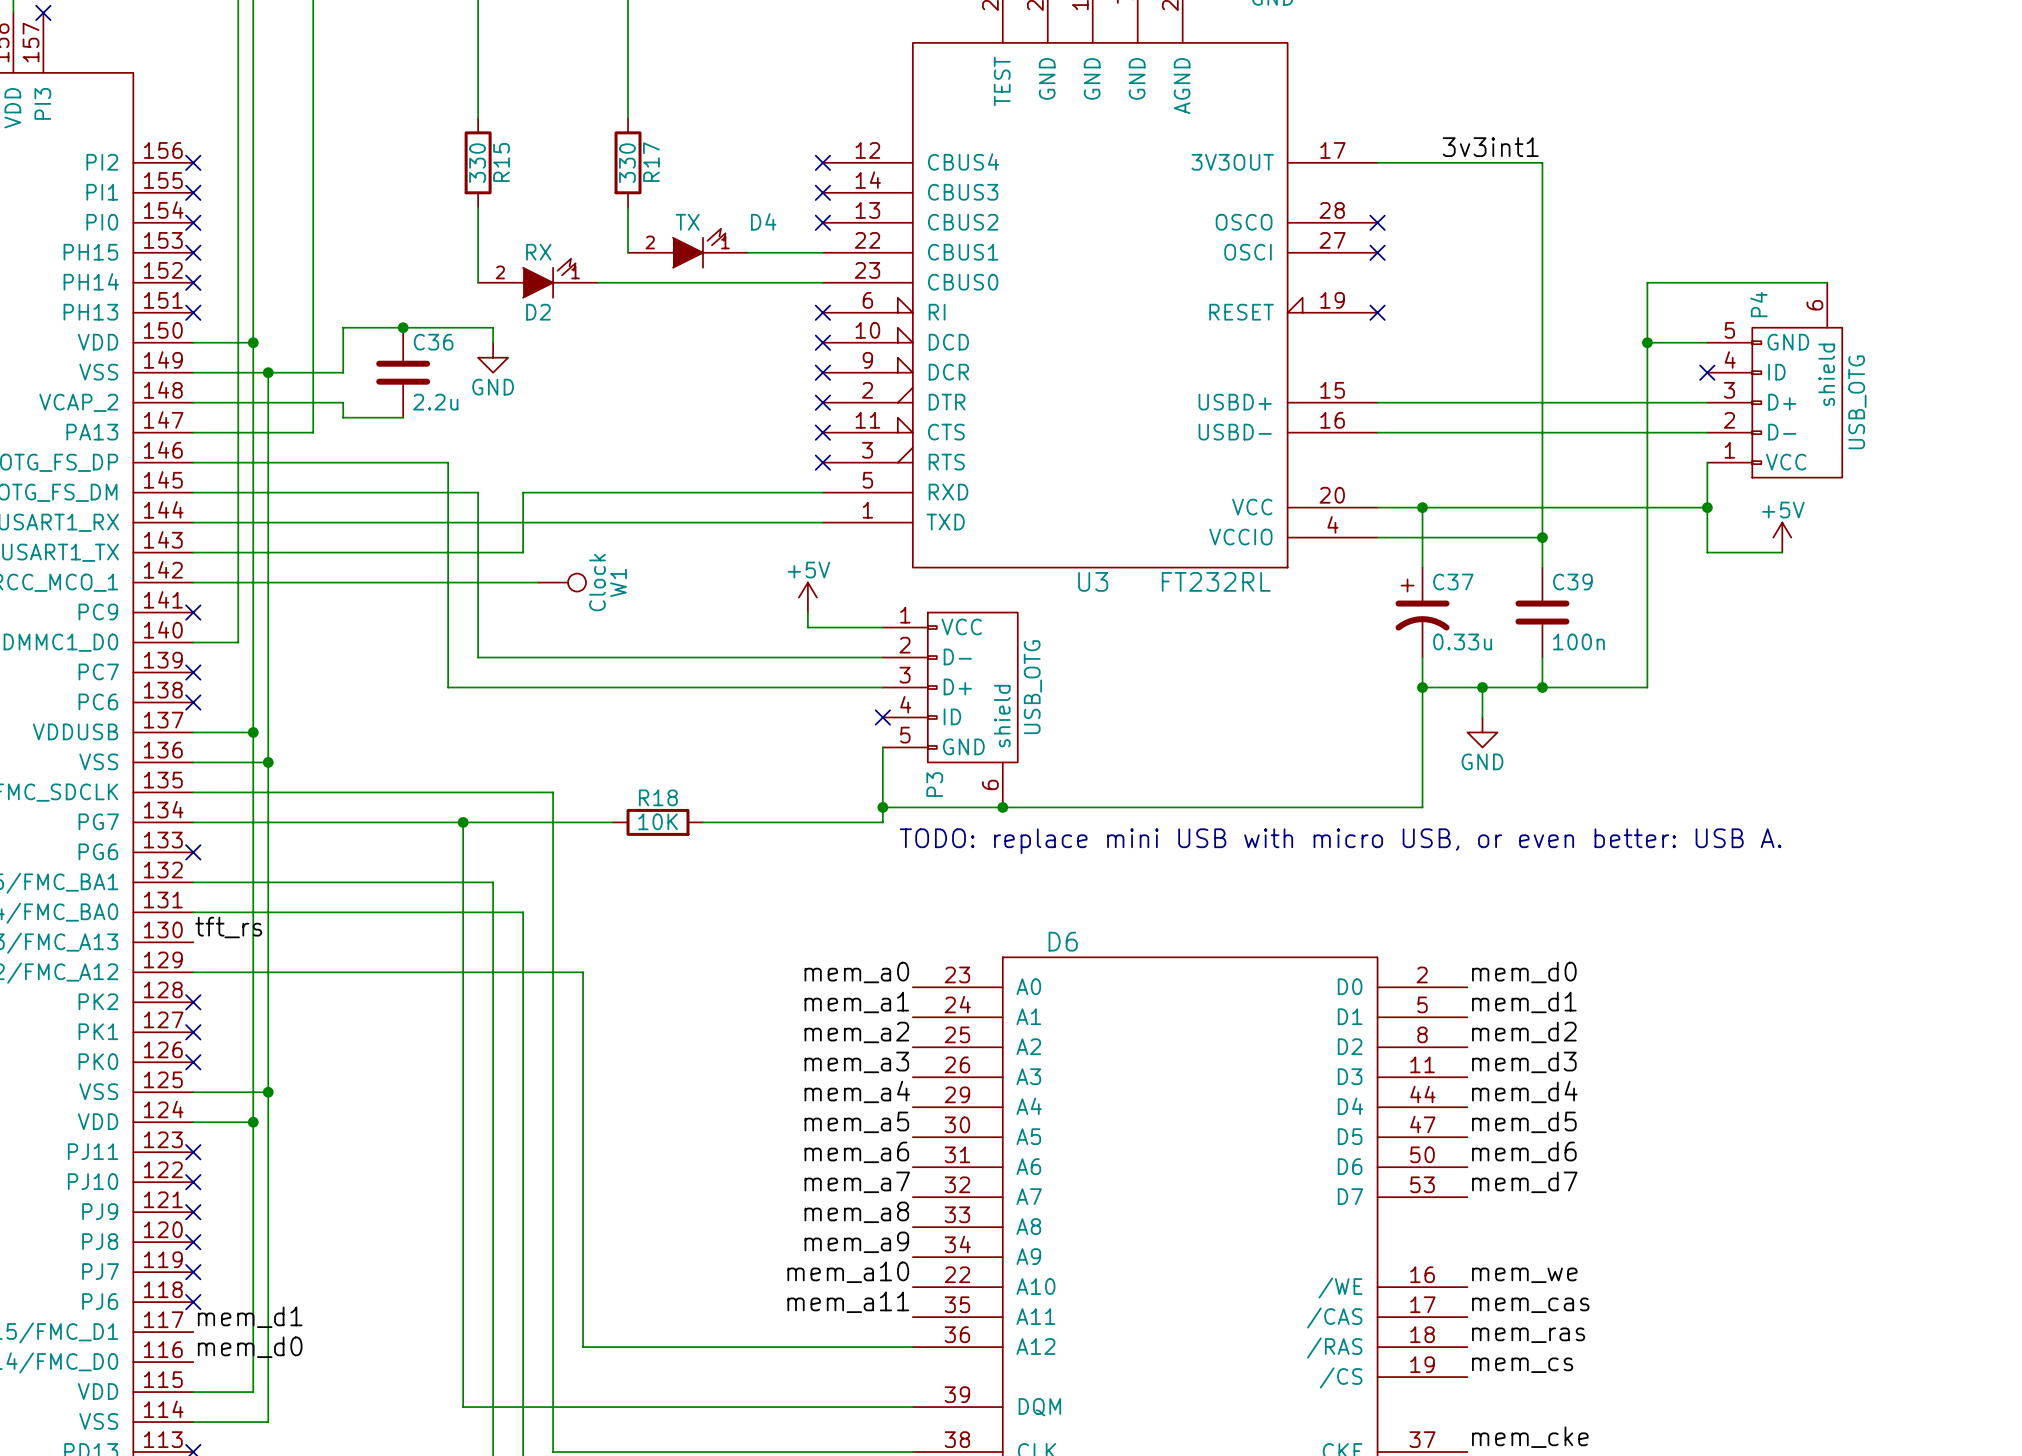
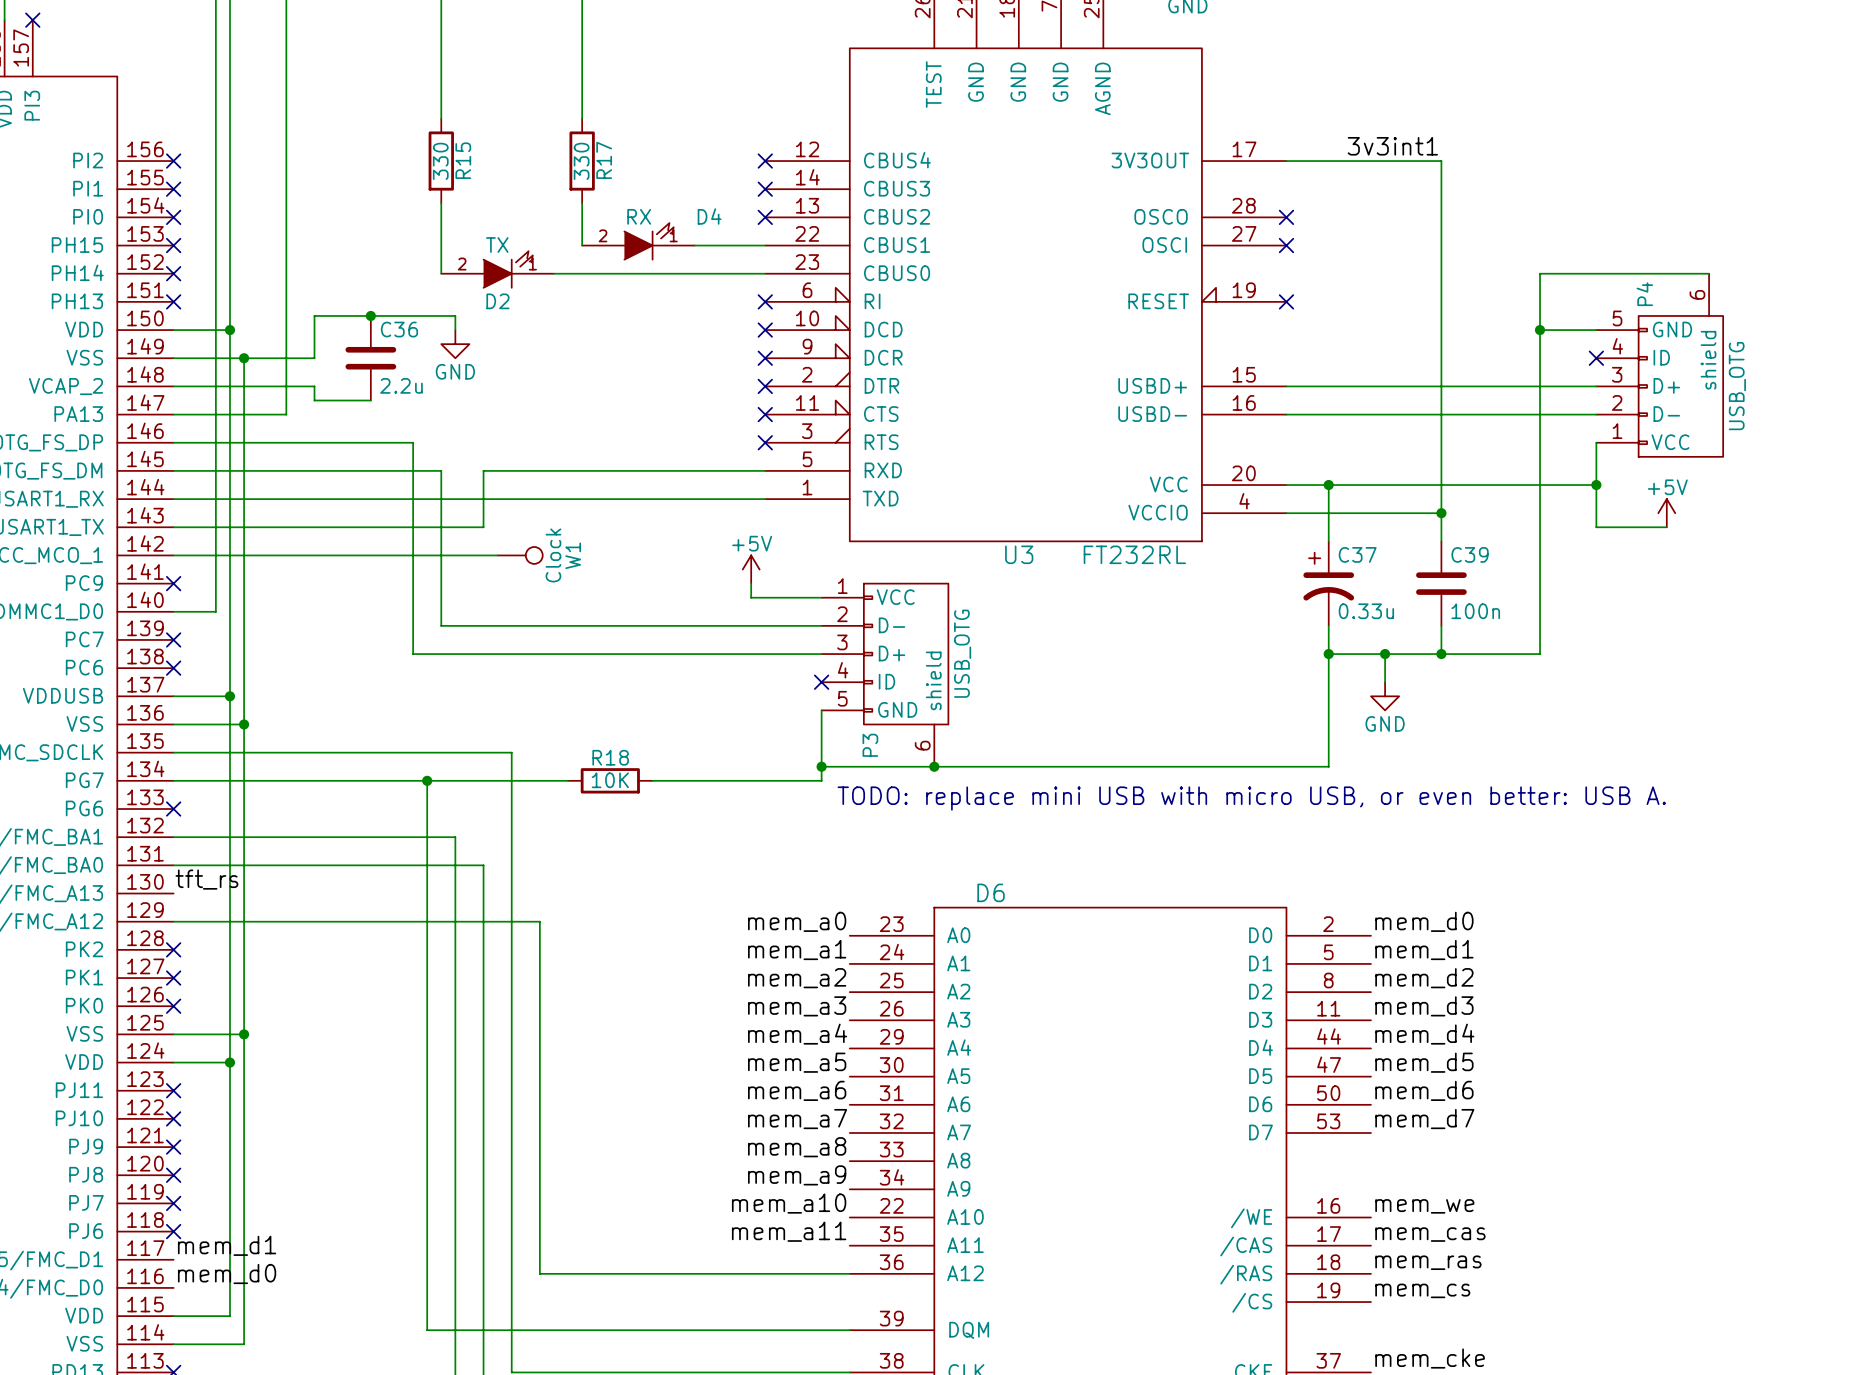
D4 value: TX (687, 222) -> RX (639, 216)
D2 value: RX (538, 252) -> TX (497, 245)

